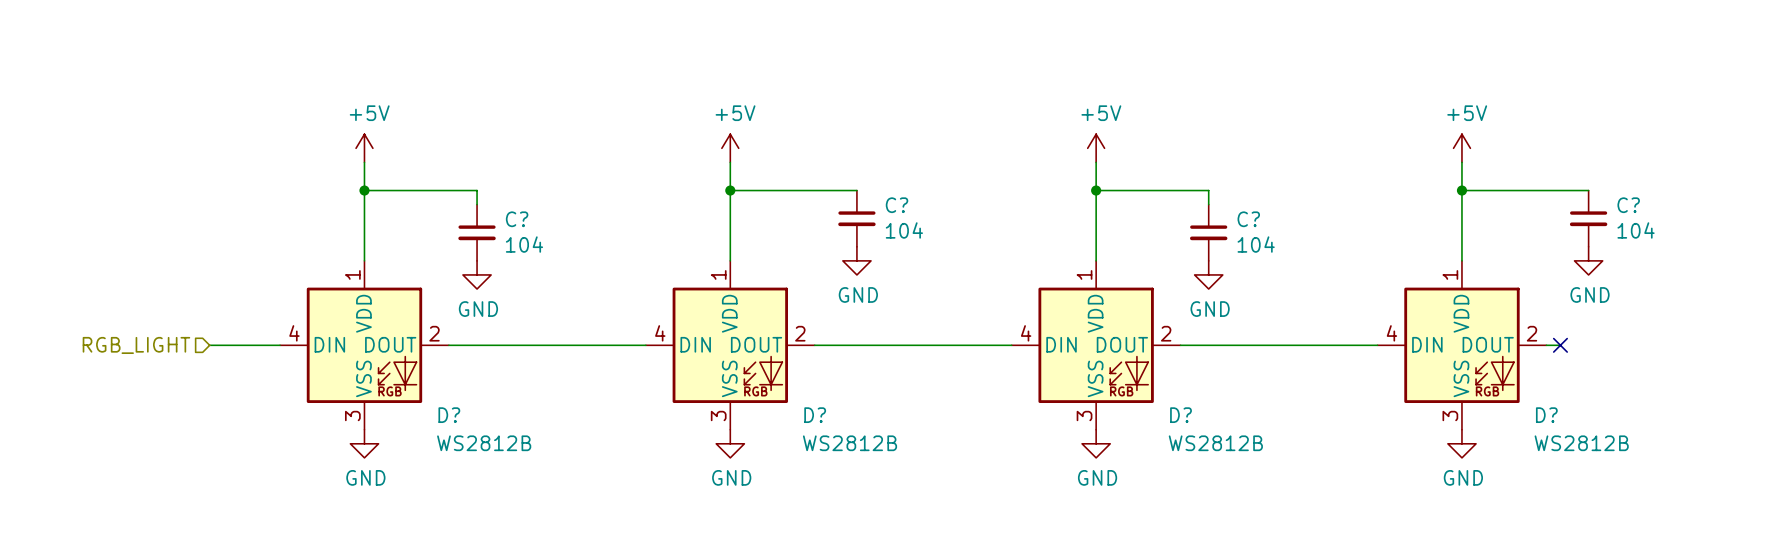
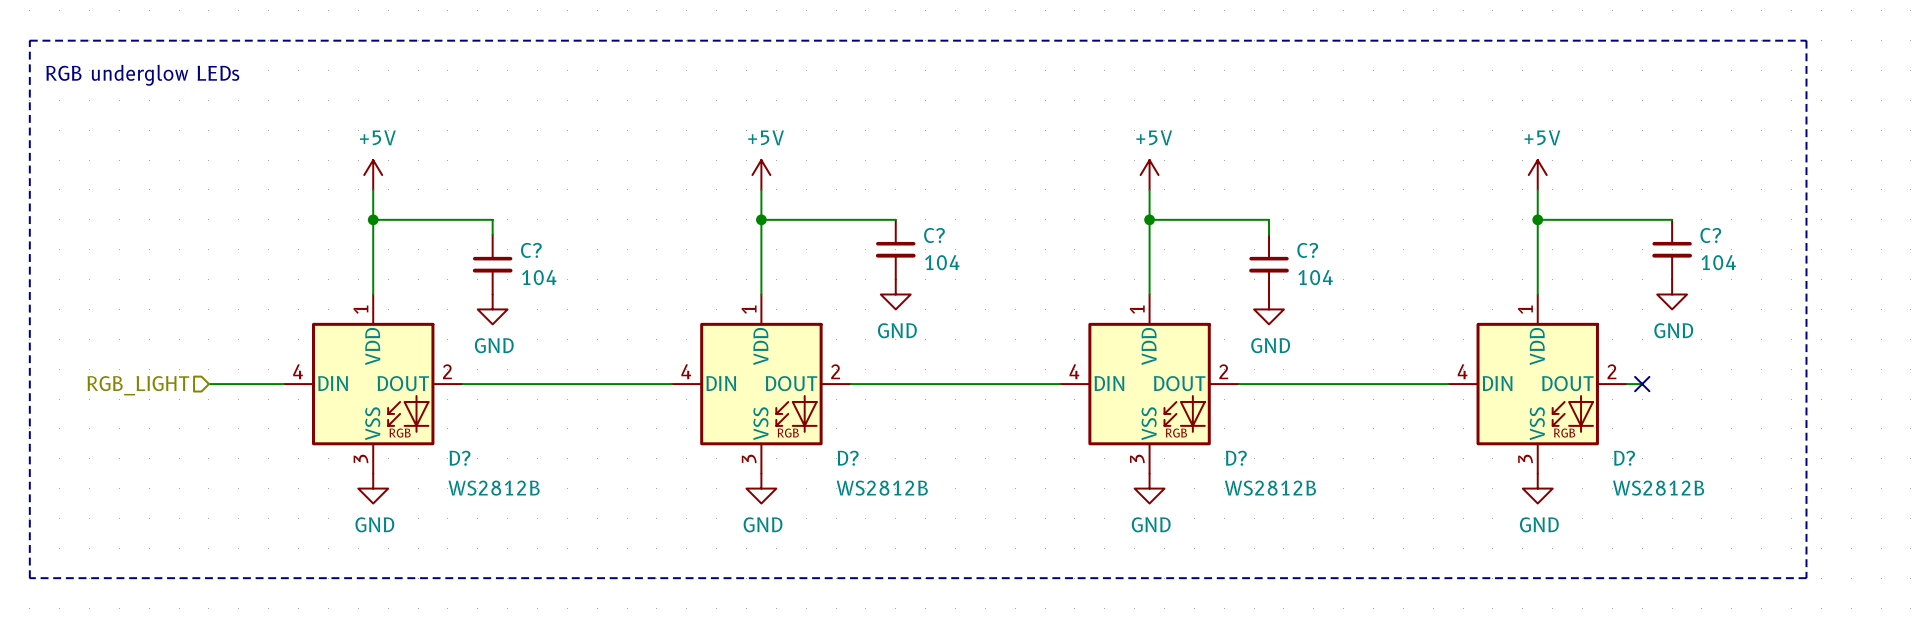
line: none -> (29, 40) (1806, 40) (1806, 578) (29, 578) (29, 40)
text: none -> RGB underglow LEDs (142, 75)

